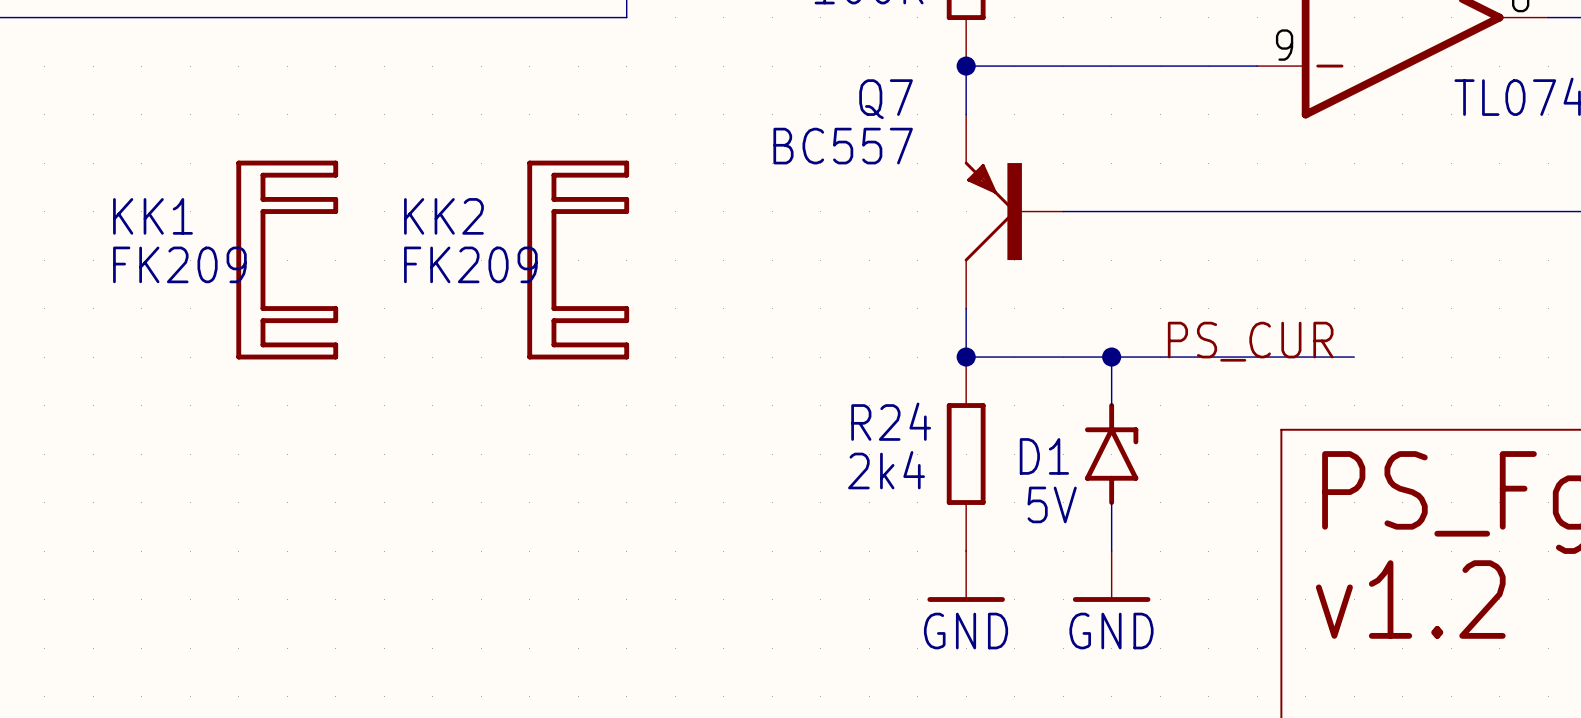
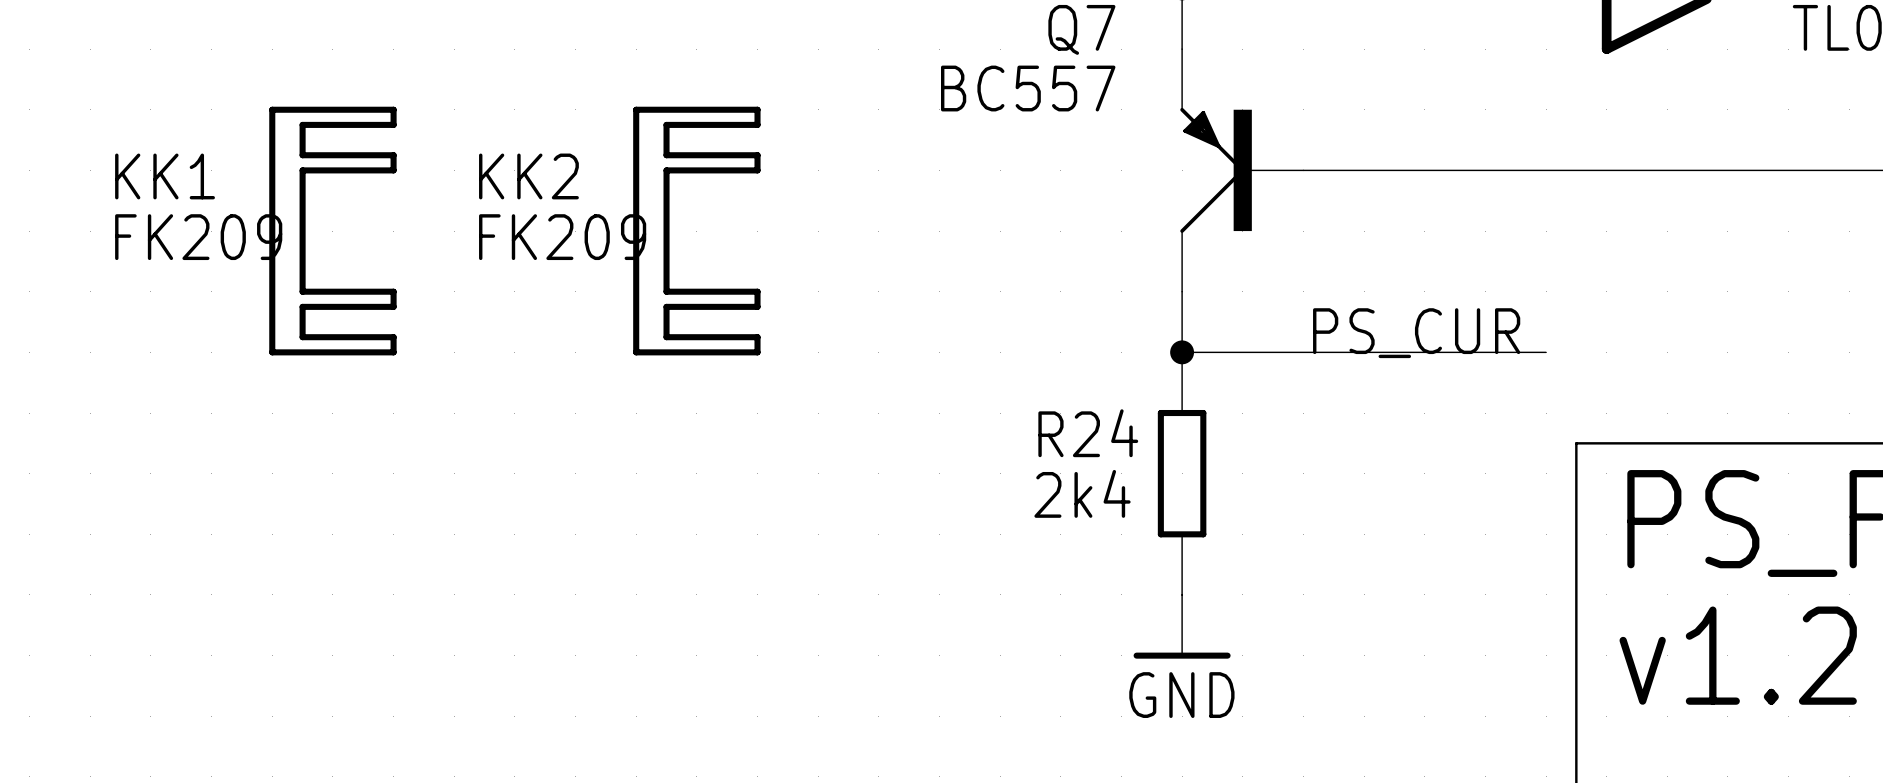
label position: PS_CUR (1250, 341) -> PS_CUR (1416, 333)
wire: (1111, 357) (1111, 405) -> none
junction: (1111, 357) -> none
wire: (1257, 357) (1354, 357) -> none
D1: 5V (1111, 454) -> none
wire: (1111, 502) (1111, 551) -> none
power symbol: GND (1111, 576) -> none

